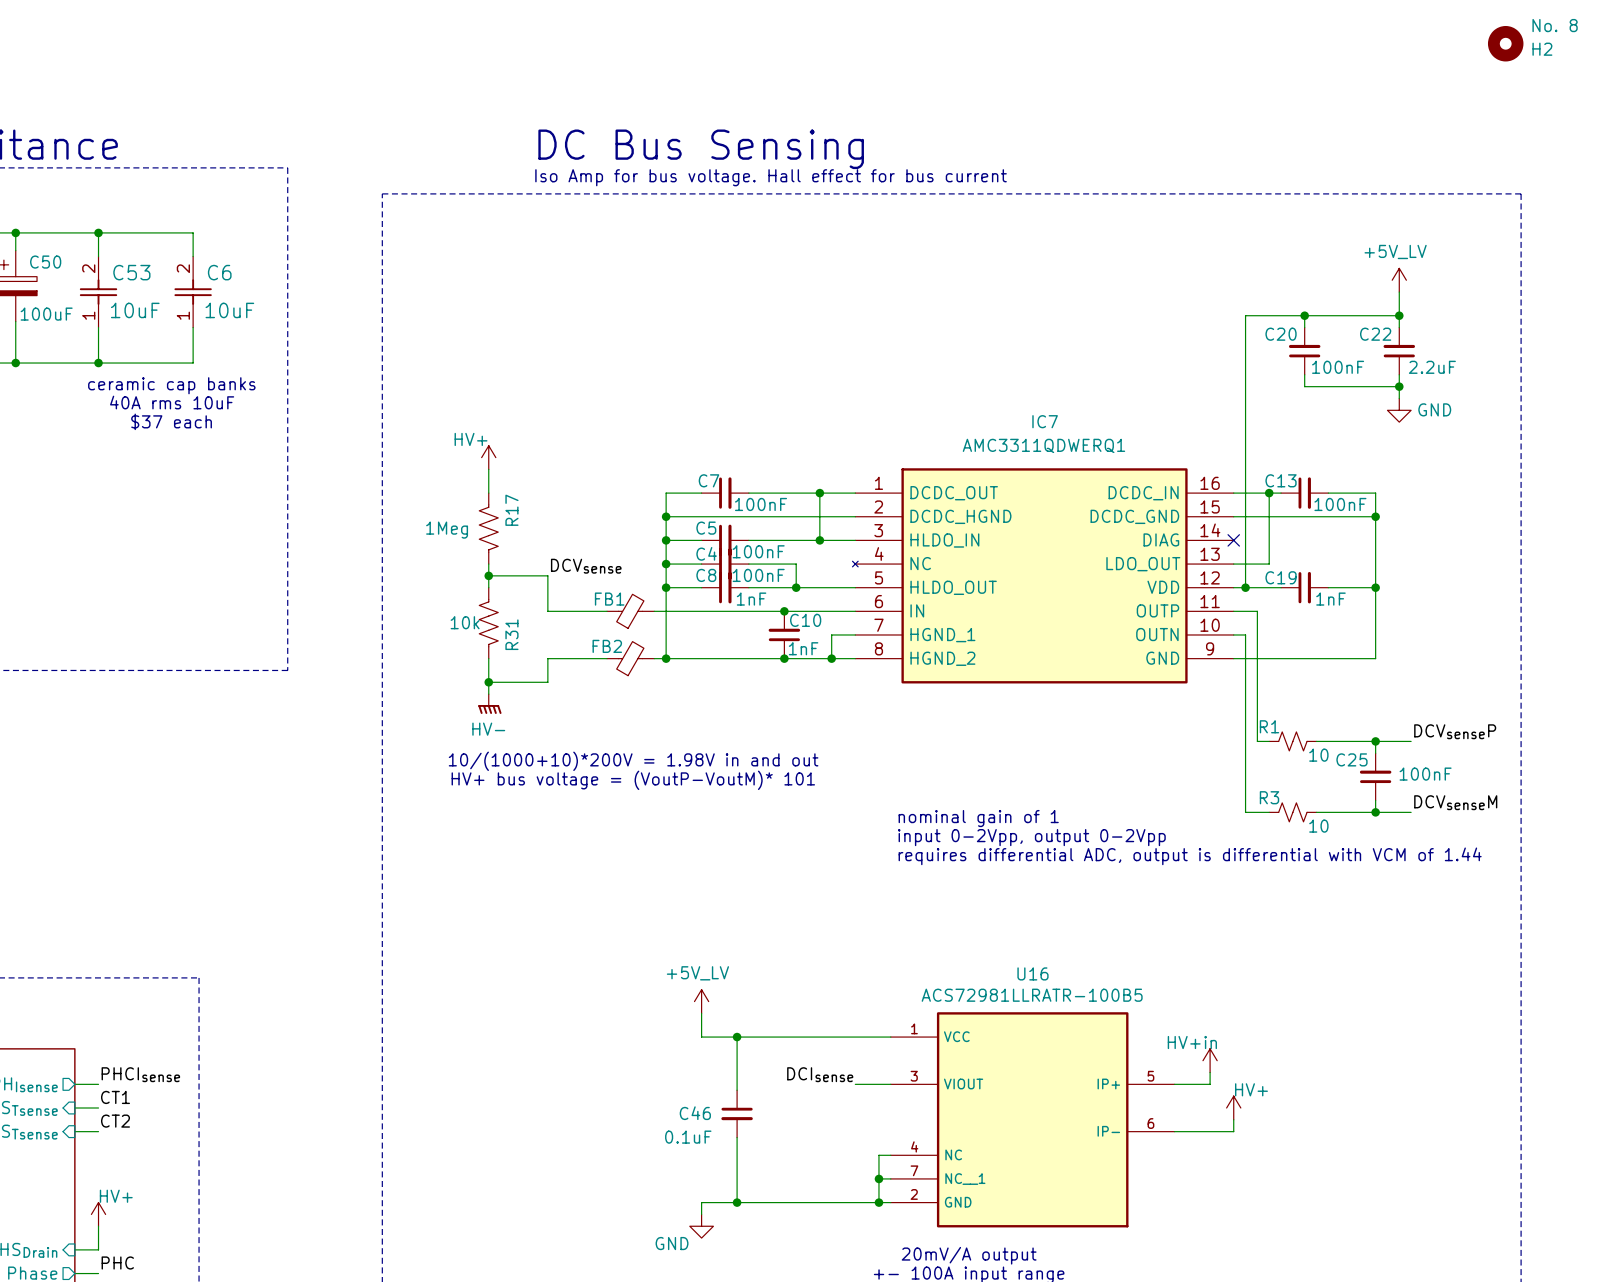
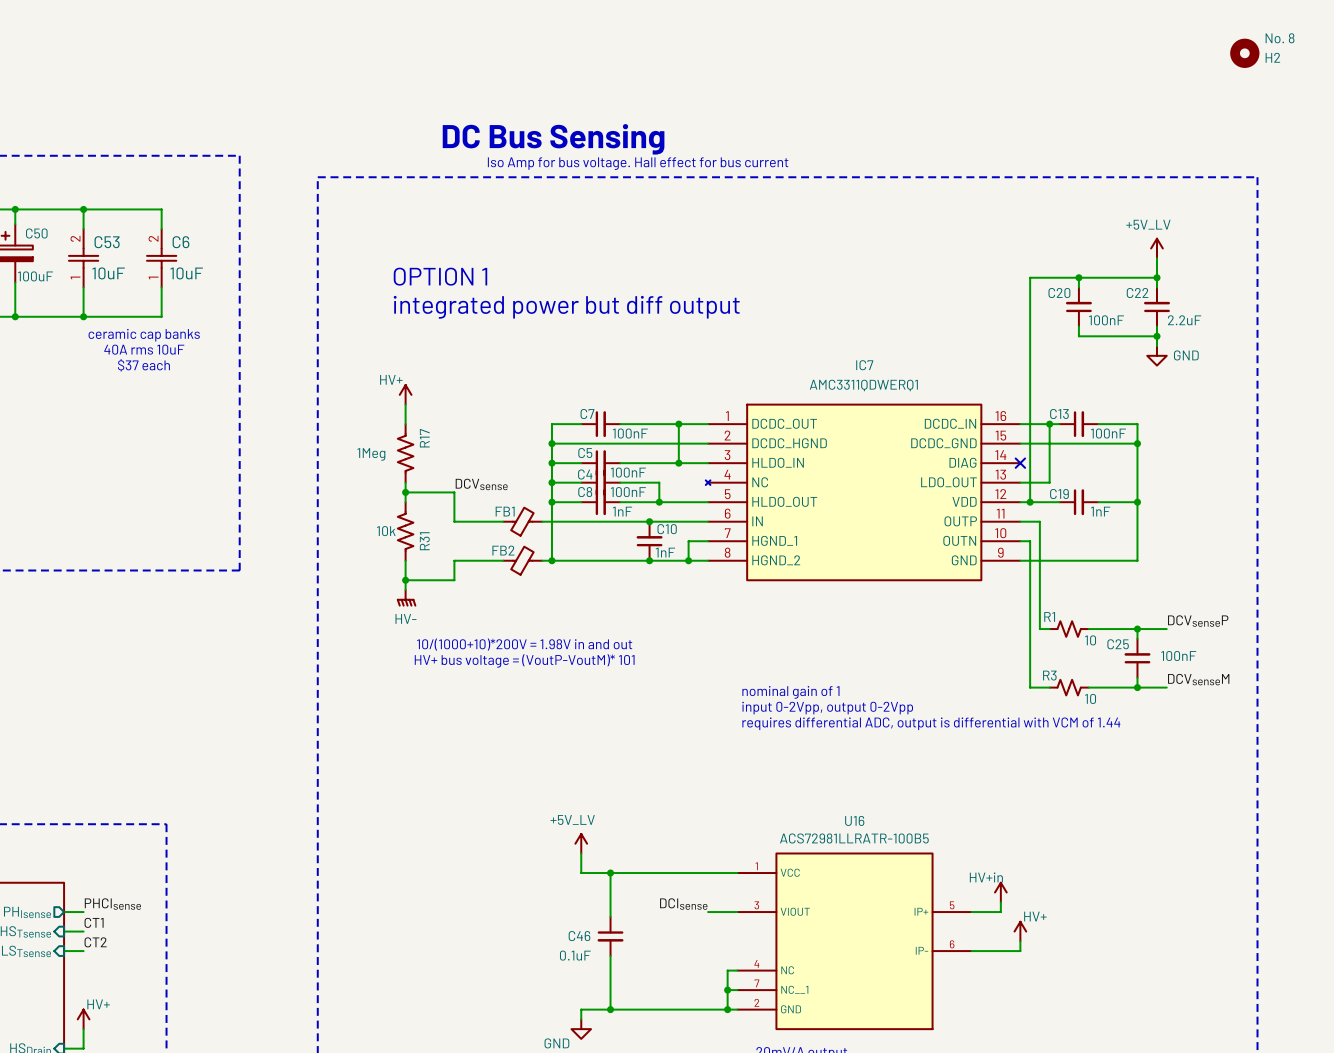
text: none -> OPTION 1 (440, 276)
text: none -> integrated power but diff output (566, 307)

